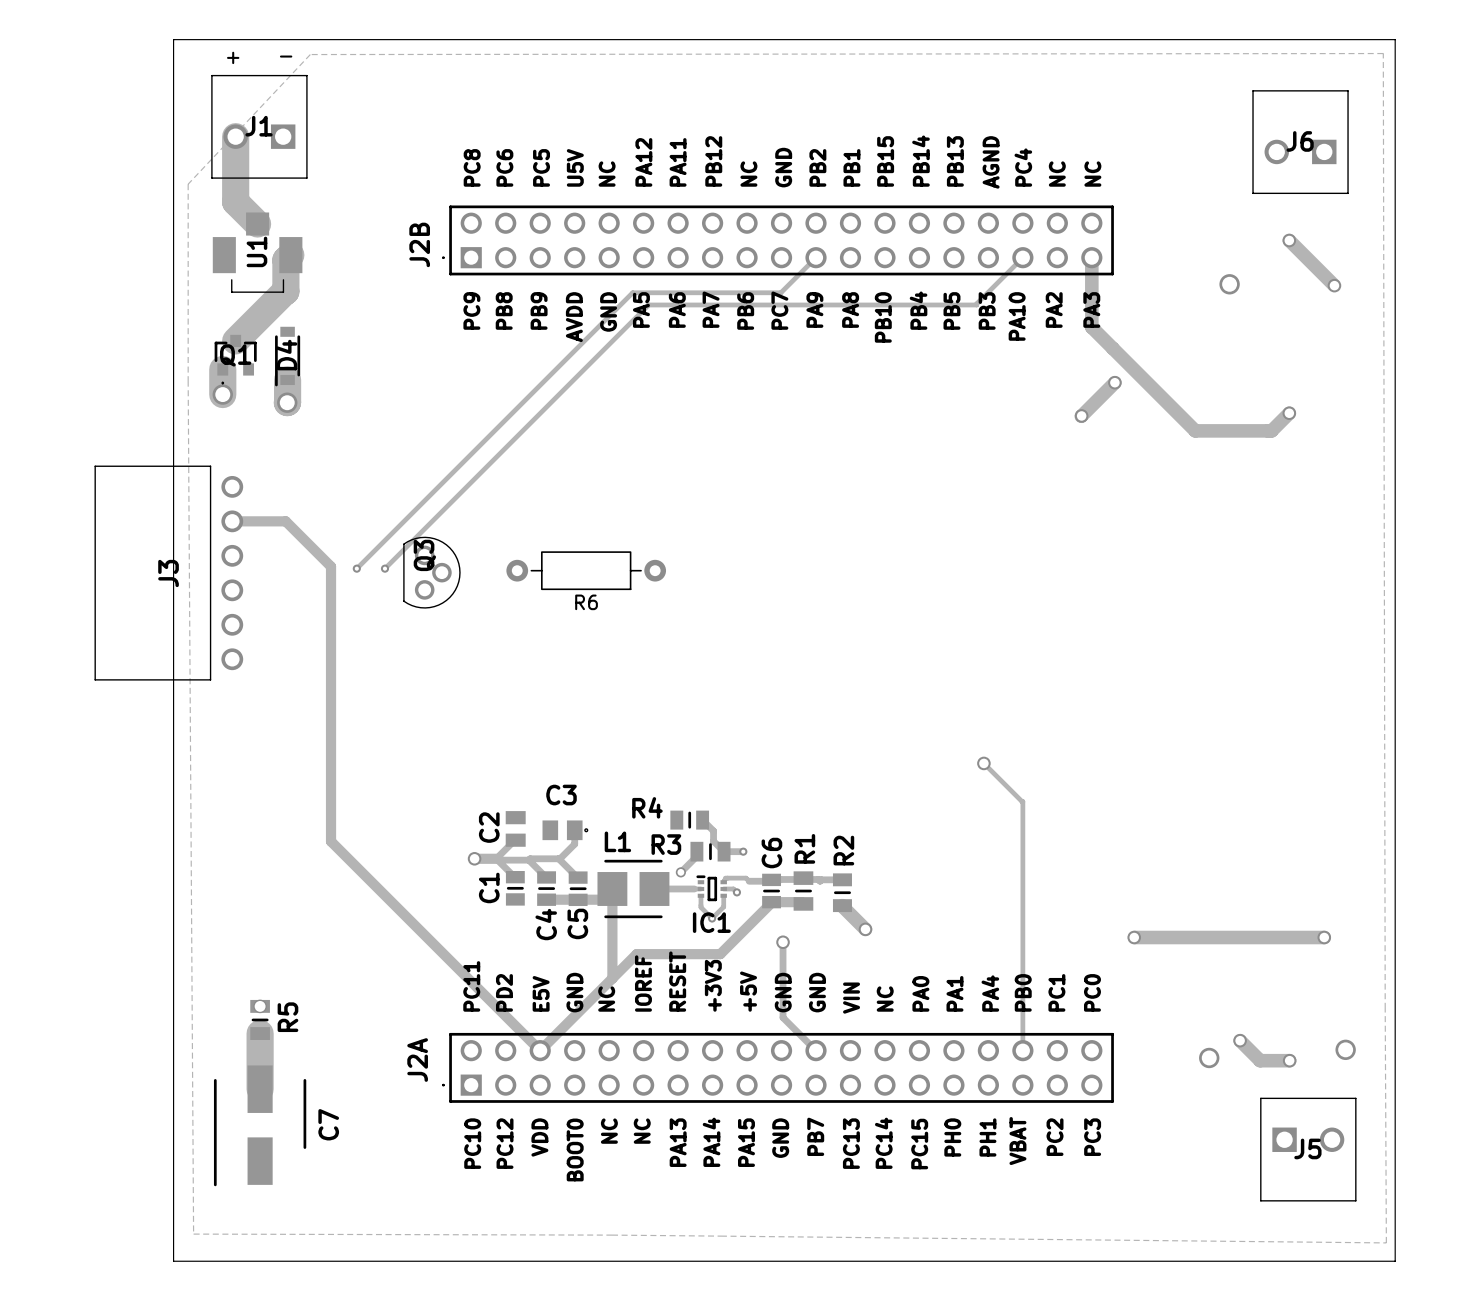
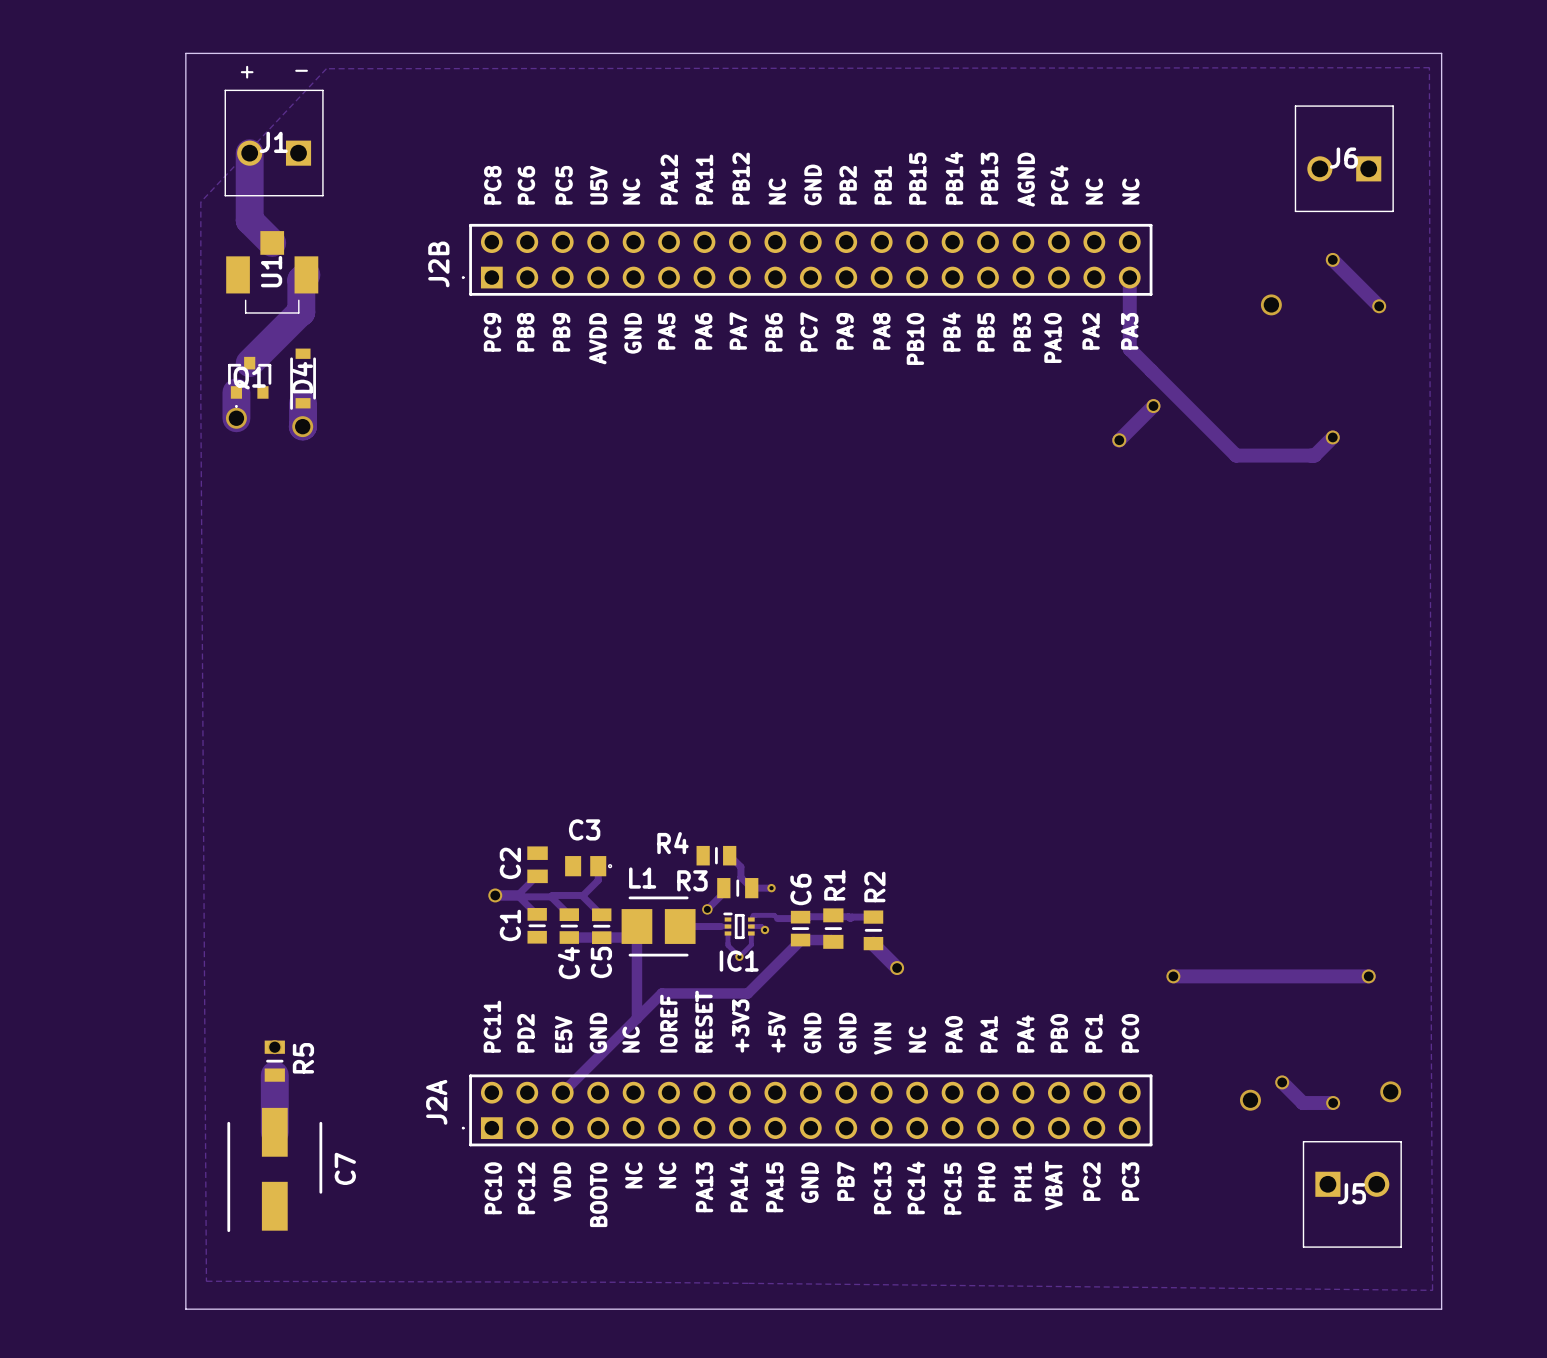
track: (816, 257) (780, 292) (632, 292) (356, 568) -> none
track: (1022, 257) (976, 304) (648, 304) (384, 568) -> none
track: (232, 521) (285, 521) (331, 566) (331, 841) (540, 1050) -> none
via: (356, 568) -> none
via: (384, 568) -> none
R6: (586, 570) -> none
Q3: (431, 572) -> none
J3: (168, 573) -> none
track: (983, 763) (1022, 801) (1022, 1050) -> none
via: (983, 763) -> none
track: (783, 942) (783, 1017) (816, 1050) -> none
via: (783, 942) -> none

